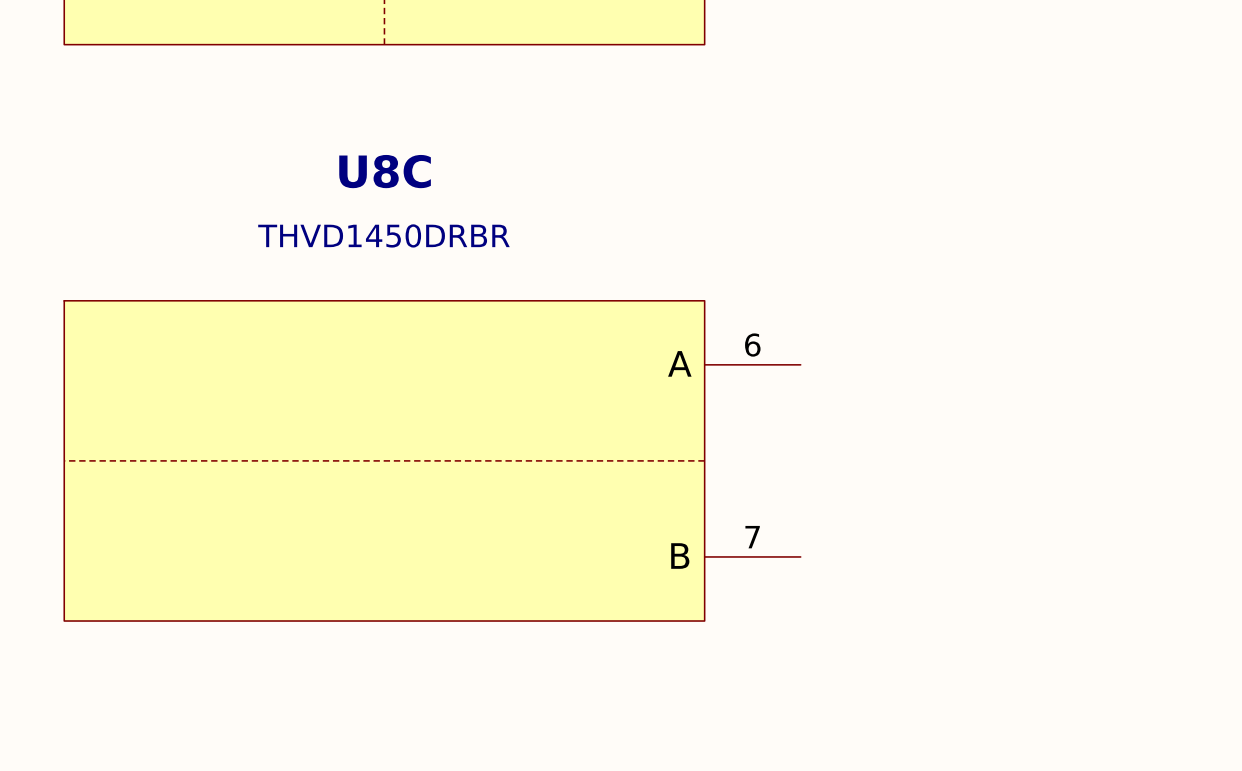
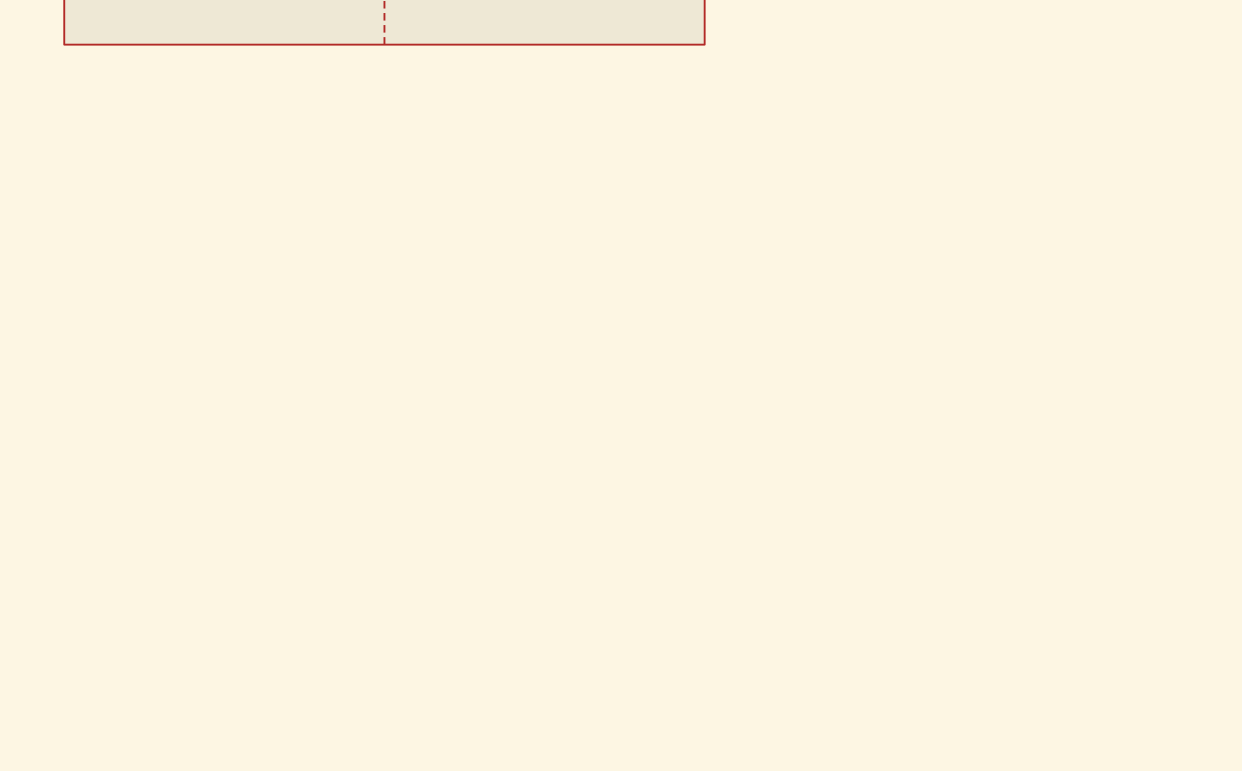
U8C: THVD1450DRBR (432, 460) -> none

